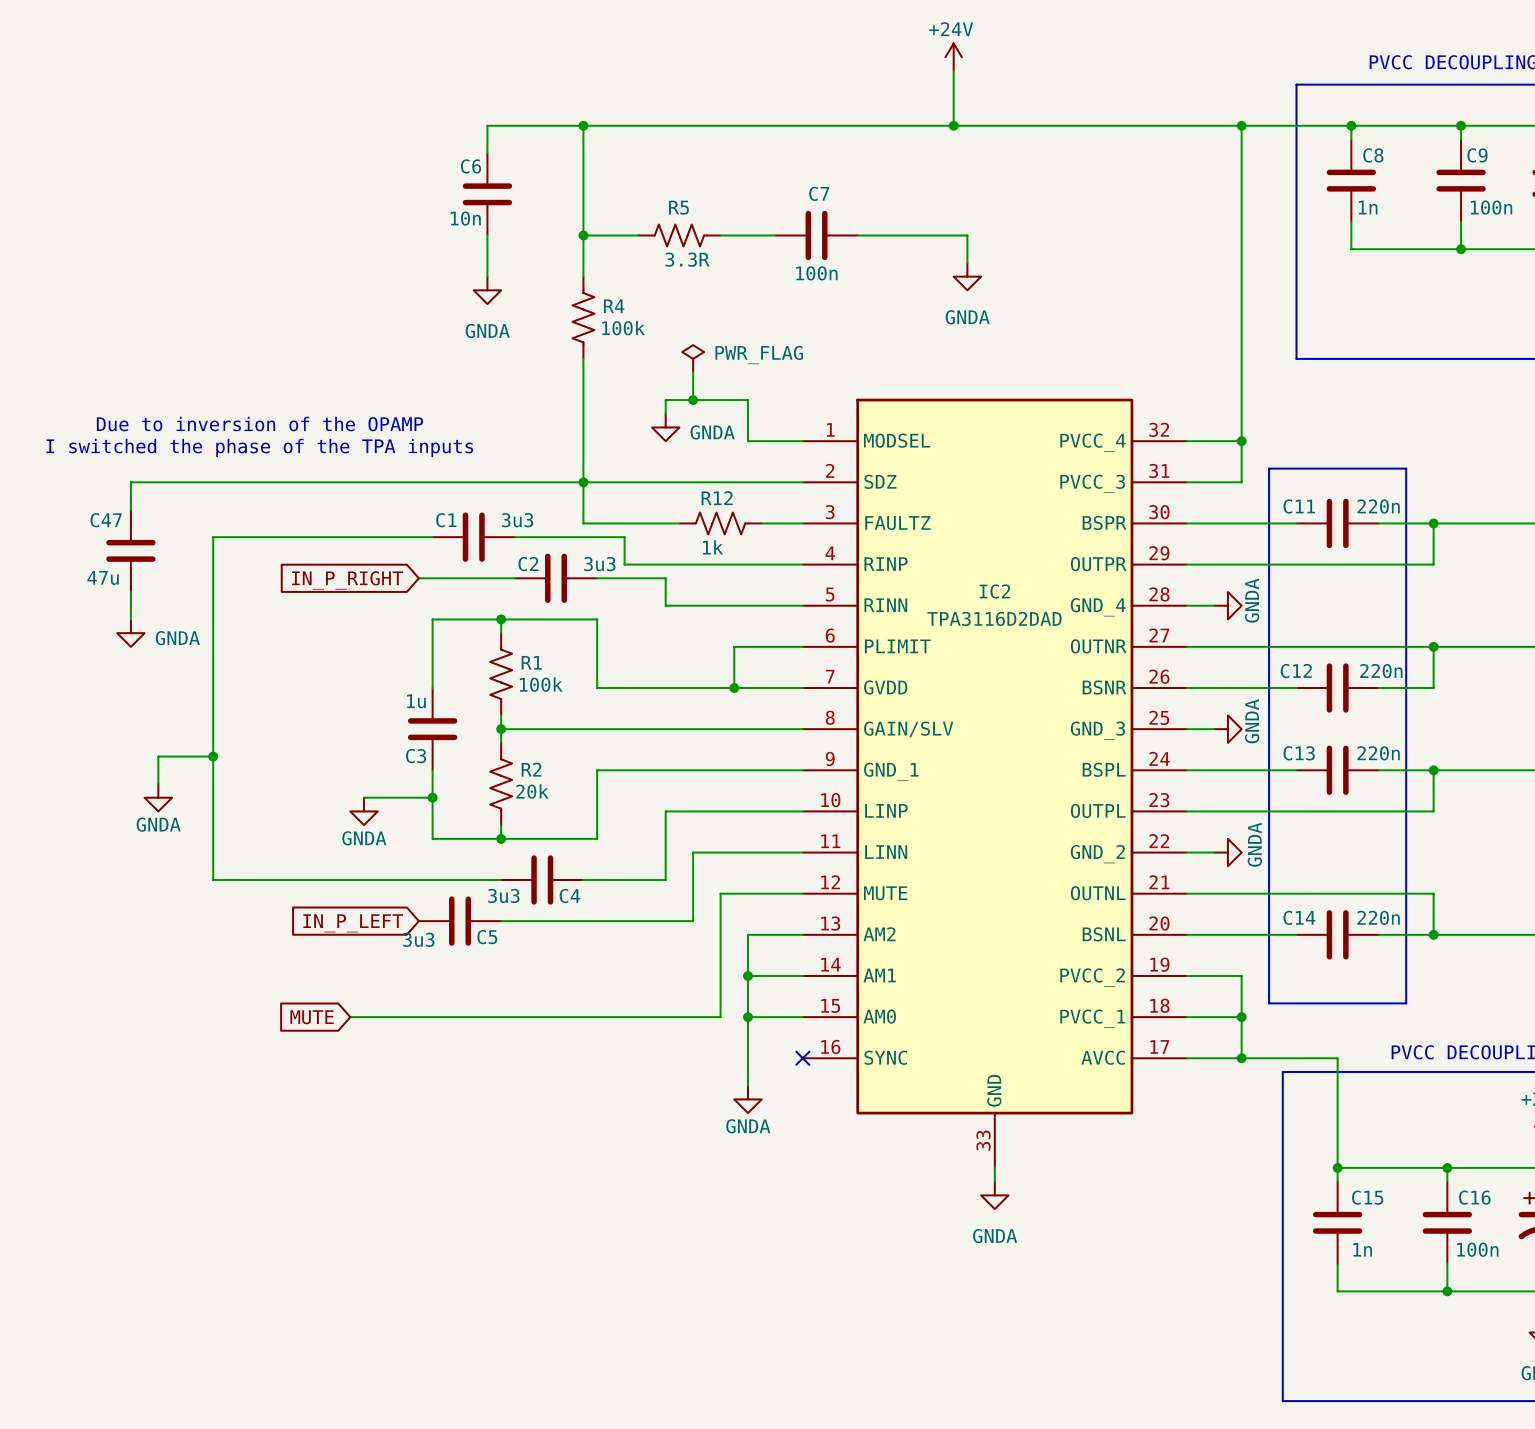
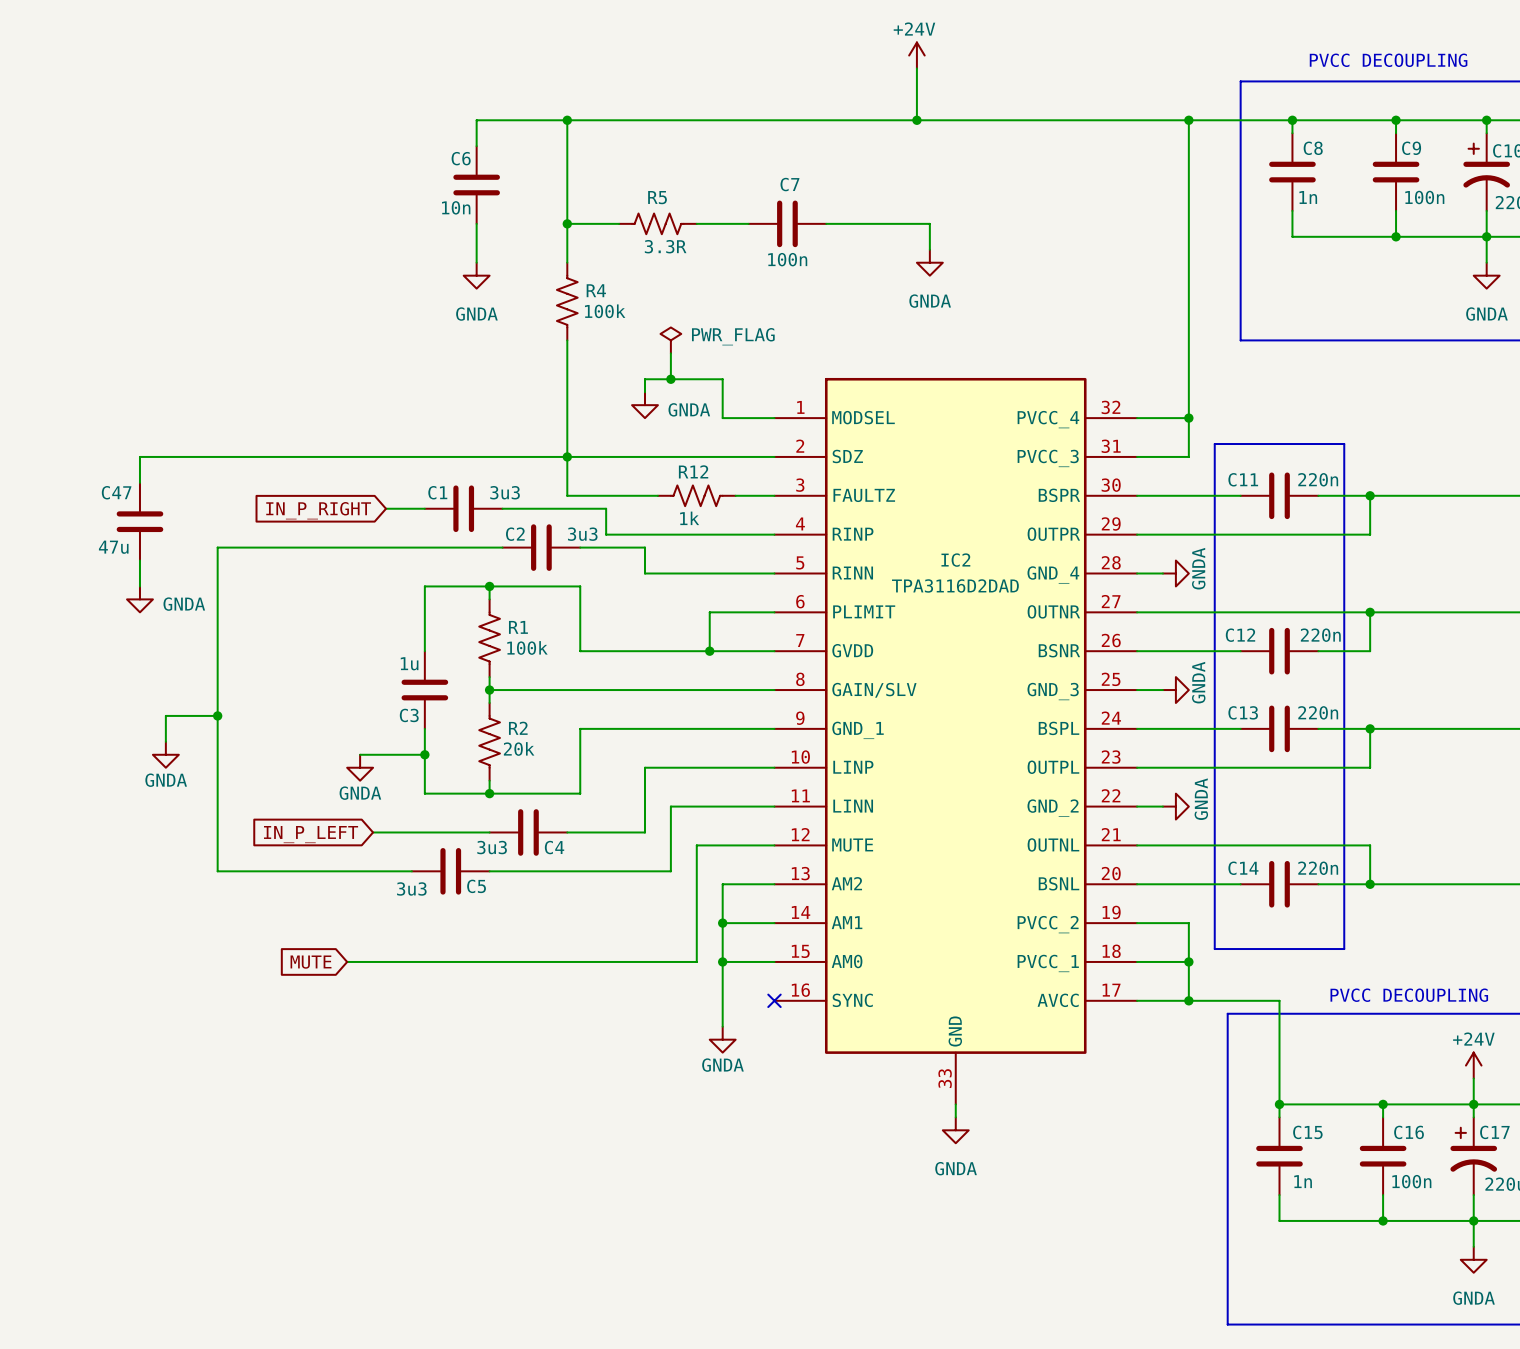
text: Due to inversion of the OPAMP (260, 424) -> none
text: I switched the phase of the TPA inputs (259, 447) -> none
wire: (391, 537) (213, 537) (213, 578) -> (411, 547) (217, 547)
global label position: IN_P_RIGHT (347, 580) -> IN_P_RIGHT (318, 510)
wire: (213, 879) (377, 879) -> (217, 832) (217, 871) (411, 871)
global label position: IN_P_LEFT (353, 923) -> IN_P_LEFT (311, 834)

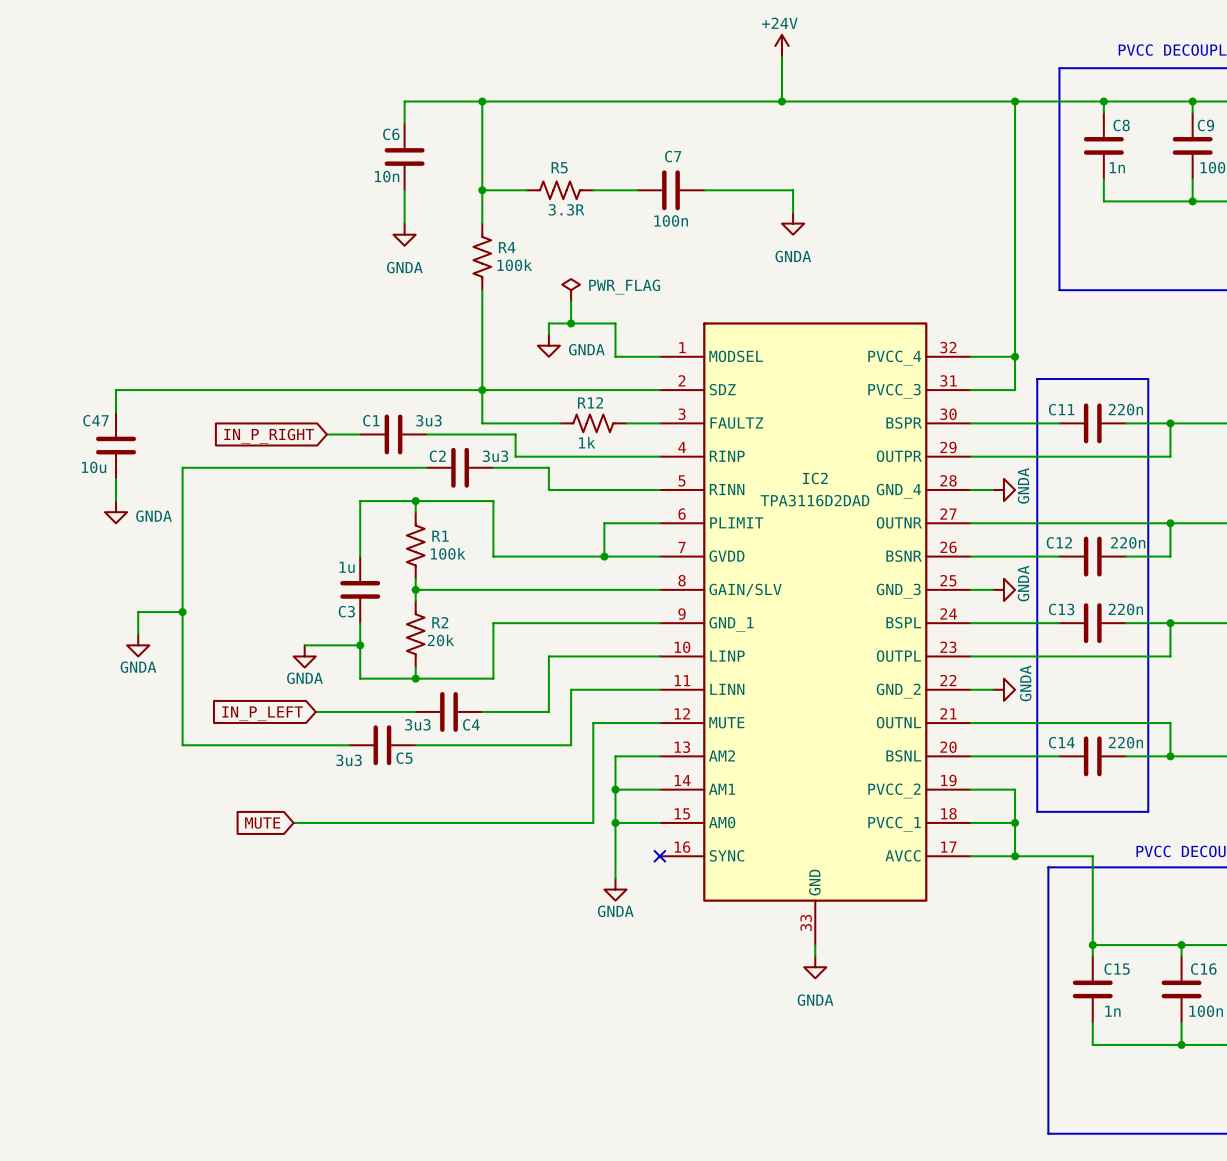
C47 value: 47u (113, 547) -> 10u (94, 467)

